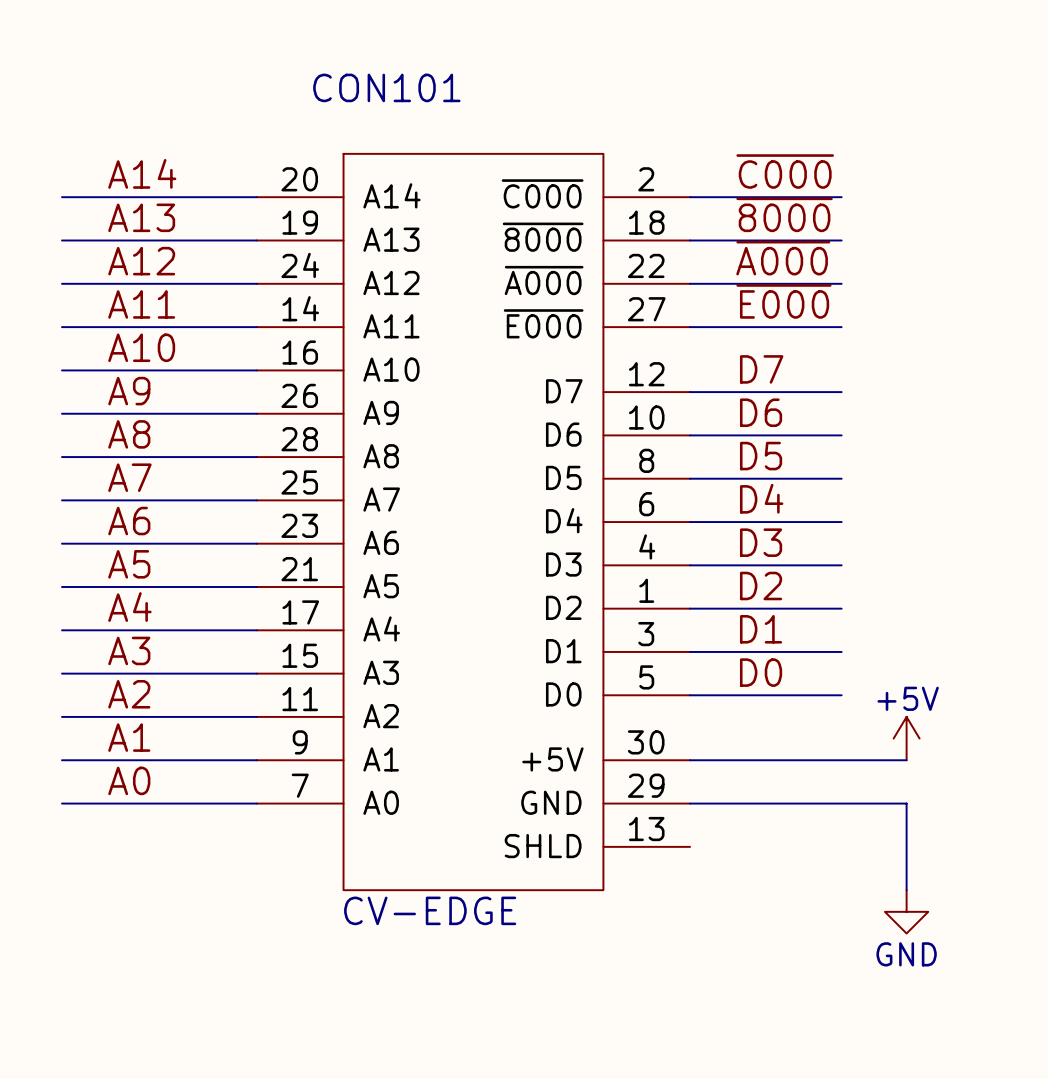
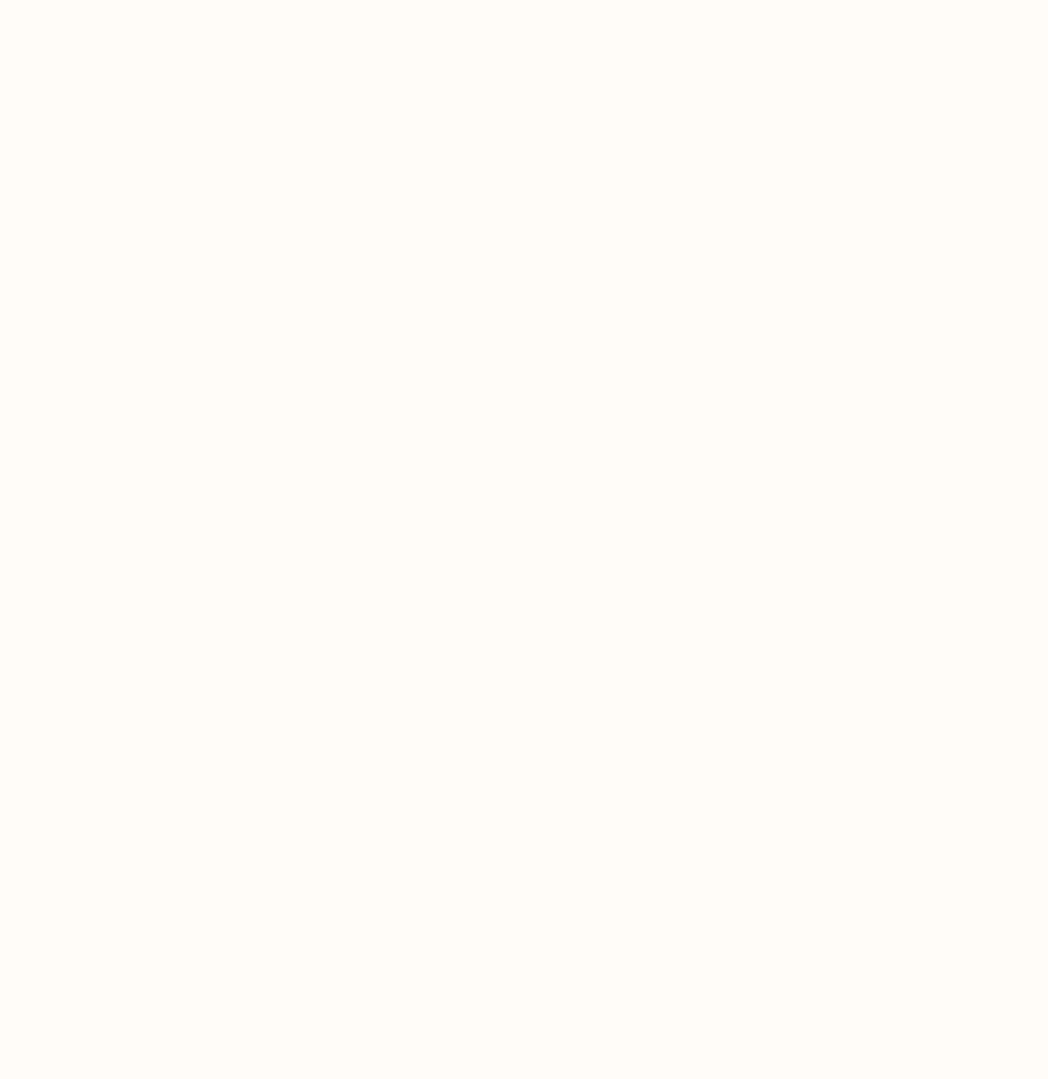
label: ~{C000} (785, 171) -> none
label: A14 (142, 173) -> none
wire: (62, 197) (256, 197) -> none
wire: (690, 197) (841, 197) -> none
label: ~{8000} (784, 214) -> none
label: A13 (141, 217) -> none
wire: (62, 240) (256, 240) -> none
wire: (690, 240) (841, 240) -> none
label: ~{A000} (783, 258) -> none
label: A12 (141, 261) -> none
wire: (62, 283) (256, 283) -> none
wire: (690, 283) (841, 283) -> none
label: ~{E000} (783, 301) -> none
label: A11 (141, 304) -> none
wire: (62, 327) (256, 327) -> none
wire: (690, 327) (841, 327) -> none
label: A10 (141, 347) -> none
label: D7 (761, 369) -> none
wire: (62, 370) (256, 370) -> none
label: A9 (129, 391) -> none
wire: (690, 392) (841, 392) -> none
label: D6 (761, 412) -> none
wire: (62, 413) (256, 413) -> none
label: A8 (129, 434) -> none
wire: (690, 435) (841, 435) -> none
label: D5 (761, 456) -> none
wire: (62, 457) (256, 457) -> none
label: A7 (129, 477) -> none
wire: (690, 478) (841, 478) -> none
label: D4 (761, 498) -> none
wire: (62, 500) (256, 500) -> none
label: A6 (129, 521) -> none
CON101: CV-EDGE (473, 522) -> none
wire: (690, 522) (841, 522) -> none
label: D3 (761, 542) -> none
wire: (62, 543) (256, 543) -> none
label: A5 (129, 564) -> none
wire: (690, 565) (841, 565) -> none
label: D2 (761, 585) -> none
wire: (62, 587) (256, 587) -> none
label: A4 (129, 607) -> none
wire: (690, 608) (841, 608) -> none
label: D1 (761, 629) -> none
wire: (62, 630) (256, 630) -> none
label: A3 (129, 650) -> none
wire: (690, 651) (841, 651) -> none
label: D0 (761, 672) -> none
wire: (62, 673) (256, 673) -> none
label: A2 (129, 694) -> none
wire: (690, 695) (841, 695) -> none
wire: (62, 716) (256, 716) -> none
label: A1 (129, 737) -> none
power symbol: +5V (906, 738) -> none
wire: (62, 760) (256, 760) -> none
wire: (690, 760) (906, 760) -> none
label: A0 (129, 780) -> none
wire: (62, 803) (256, 803) -> none
wire: (690, 803) (906, 803) (906, 890) -> none
power symbol: GND (906, 911) -> none

